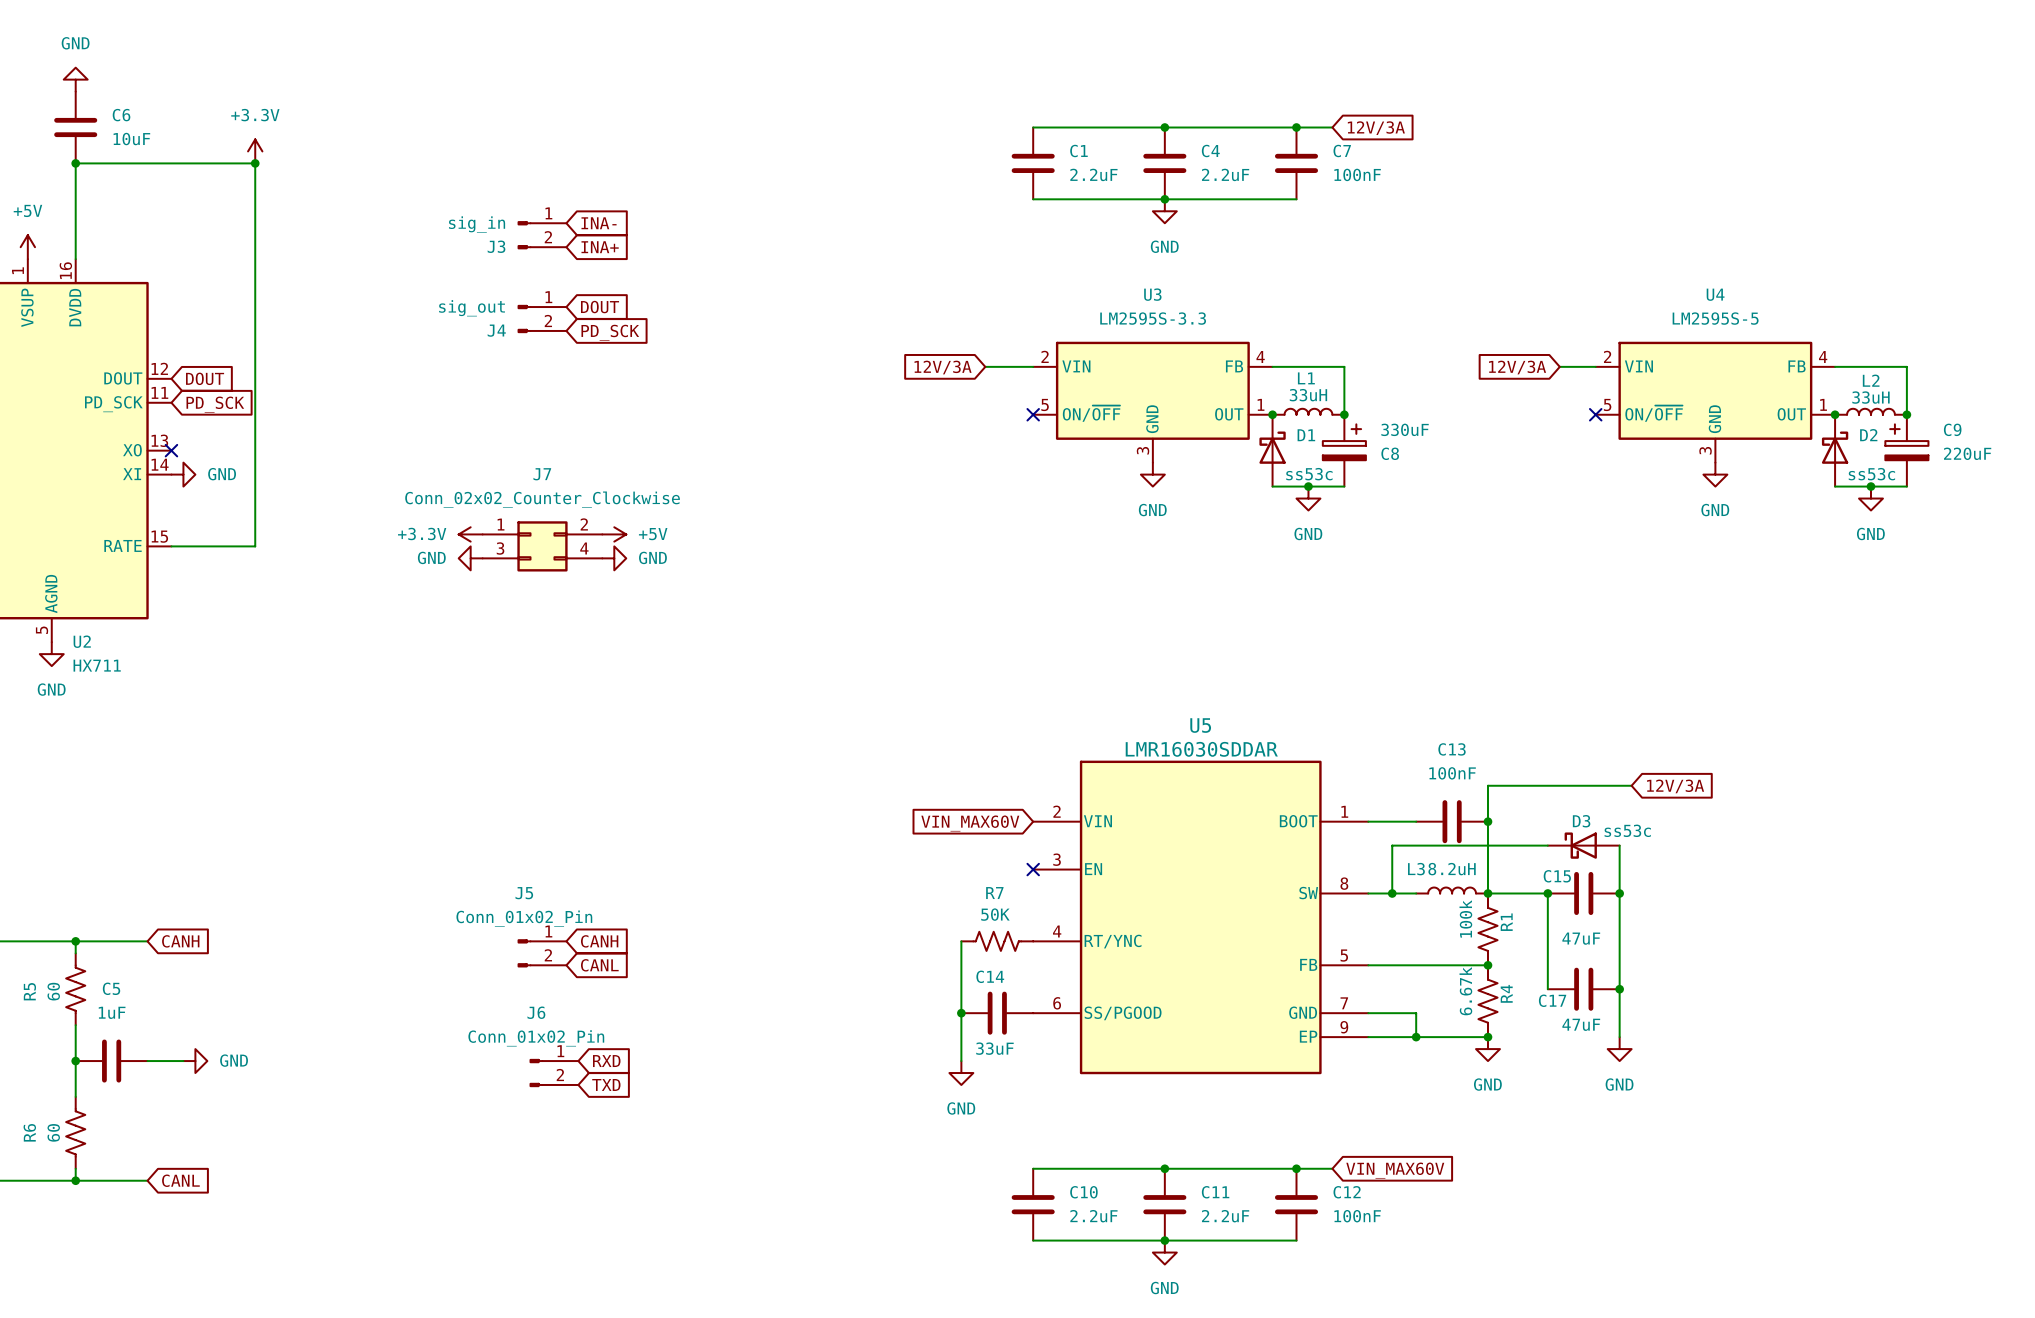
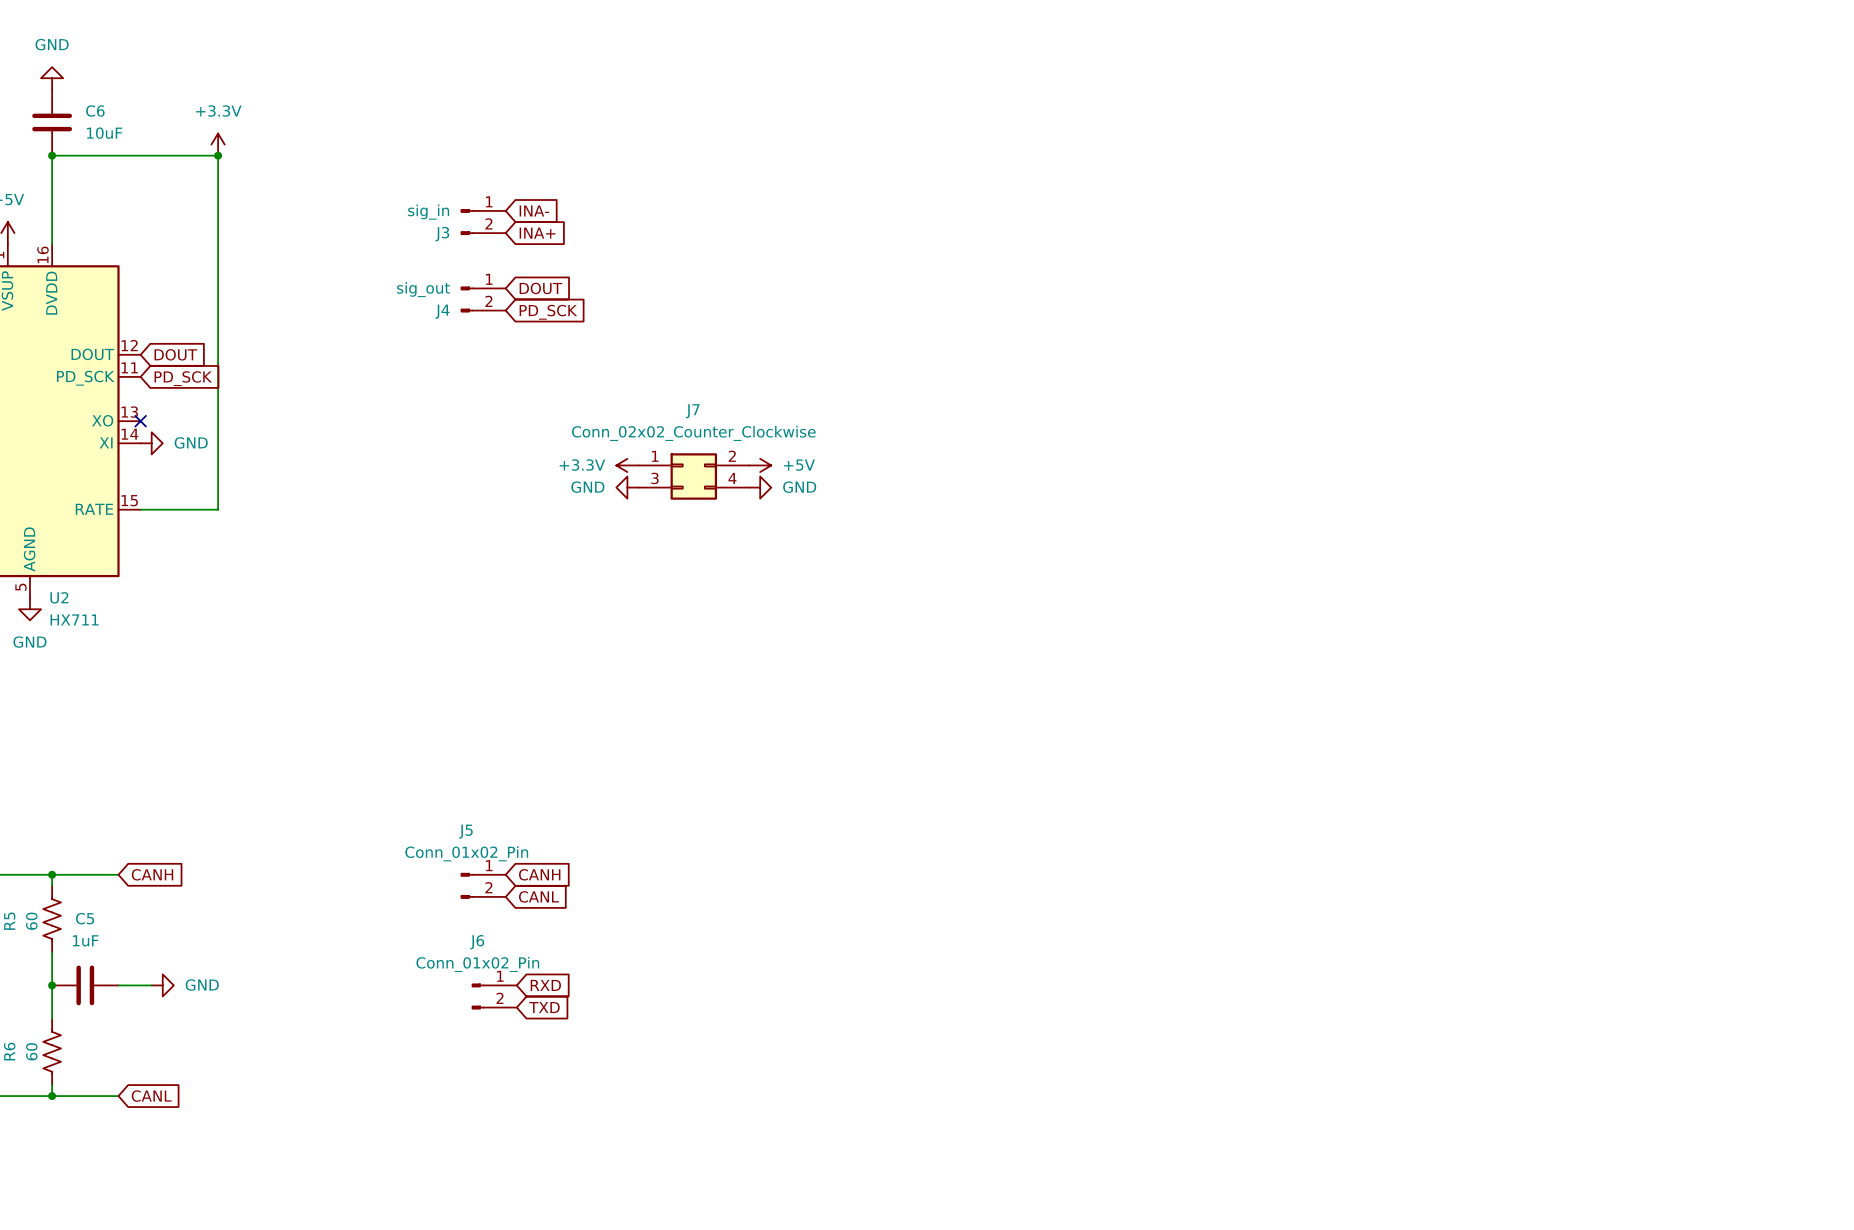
wire: (1033, 127) (1332, 127) -> none
junction: (1164, 127) -> none
junction: (1296, 127) -> none
global label: 12V/3A (1376, 128) -> none
C1: 2.2uF (1033, 163) -> none
C4: 2.2uF (1164, 163) -> none
C7: 100nF (1296, 163) -> none
wire: (1033, 199) (1296, 199) -> none
junction: (1164, 199) -> none
power symbol: GND (1164, 211) -> none
wire: (985, 366) (1033, 366) -> none
wire: (1272, 366) (1344, 366) (1344, 414) -> none
wire: (1559, 366) (1595, 366) -> none
wire: (1835, 366) (1906, 366) (1906, 414) -> none
global label: 12V/3A (943, 367) -> none
global label: 12V/3A (1517, 367) -> none
U3: LM2595S-3.3 (1152, 402) -> none
U4: LM2595S-5 (1715, 402) -> none
L1: 33uH (1308, 411) -> none
L2: 33uH (1870, 411) -> none
no-connect mark: (1033, 414) -> none
junction: (1272, 414) -> none
junction: (1344, 414) -> none
no-connect mark: (1595, 414) -> none
junction: (1835, 414) -> none
junction: (1906, 414) -> none
D1: ss53c (1272, 450) -> none
C8: 330uF (1344, 450) -> none
D2: ss53c (1835, 450) -> none
C9: 220uF (1906, 450) -> none
power symbol: GND (1152, 474) -> none
power symbol: GND (1715, 474) -> none
wire: (1272, 486) (1344, 486) -> none
junction: (1308, 486) -> none
wire: (1835, 486) (1906, 486) -> none
junction: (1870, 486) -> none
power symbol: GND (1308, 498) -> none
power symbol: GND (1870, 498) -> none
power symbol: none -> GND (760, 487)
power symbol position: +3.3V (470, 534) -> +3.3V (627, 465)
power symbol position: +5V (614, 534) -> +5V (760, 465)
J7 position: (542, 546) -> (693, 476)
power symbol: GND (470, 558) -> none
power symbol rotation: 0° (614, 558) -> 180° (627, 487)
power symbol position: GND (614, 558) -> GND (627, 487)
wire: (1631, 785) (1487, 785) (1487, 893) (1547, 893) (1547, 989) -> none
global label: 12V/3A (1675, 786) -> none
wire: (1368, 821) (1416, 821) -> none
C13: 100nF (1452, 821) -> none
junction: (1487, 821) -> none
global label: VIN_MAX60V (970, 823) -> none
wire: (1547, 845) (1392, 845) (1392, 893) -> none
D3: ss53c (1583, 845) -> none
wire: (1619, 845) (1619, 1037) -> none
no-connect mark: (1033, 869) -> none
L3: 8.2uH (1452, 890) -> none
wire: (1368, 893) (1416, 893) -> none
junction: (1392, 893) -> none
junction: (1487, 893) -> none
junction: (1547, 893) -> none
C15: 47uF (1583, 893) -> none
junction: (1619, 893) -> none
U5: LMR16030SDDAR (1200, 917) -> none
R1: 100k (1487, 929) -> none
wire: (961, 941) (961, 1061) -> none
R7: 50K (997, 941) -> none
wire: (1368, 965) (1487, 965) -> none
junction: (1487, 965) -> none
C17: 47uF (1583, 989) -> none
junction: (1619, 989) -> none
R4: 6.67k (1487, 1001) -> none
junction: (961, 1013) -> none
C14: 33uF (997, 1013) -> none
wire: (1368, 1013) (1416, 1013) (1416, 1037) -> none
wire: (1368, 1037) (1487, 1037) -> none
junction: (1416, 1037) -> none
junction: (1487, 1037) -> none
power symbol: GND (1487, 1049) -> none
power symbol: GND (1619, 1049) -> none
power symbol: GND (961, 1073) -> none
wire: (1033, 1168) (1332, 1168) -> none
junction: (1164, 1168) -> none
junction: (1296, 1168) -> none
global label: VIN_MAX60V (1395, 1170) -> none
C10: 2.2uF (1033, 1204) -> none
C11: 2.2uF (1164, 1204) -> none
C12: 100nF (1296, 1204) -> none
wire: (1033, 1240) (1296, 1240) -> none
junction: (1164, 1240) -> none
power symbol: GND (1164, 1252) -> none

